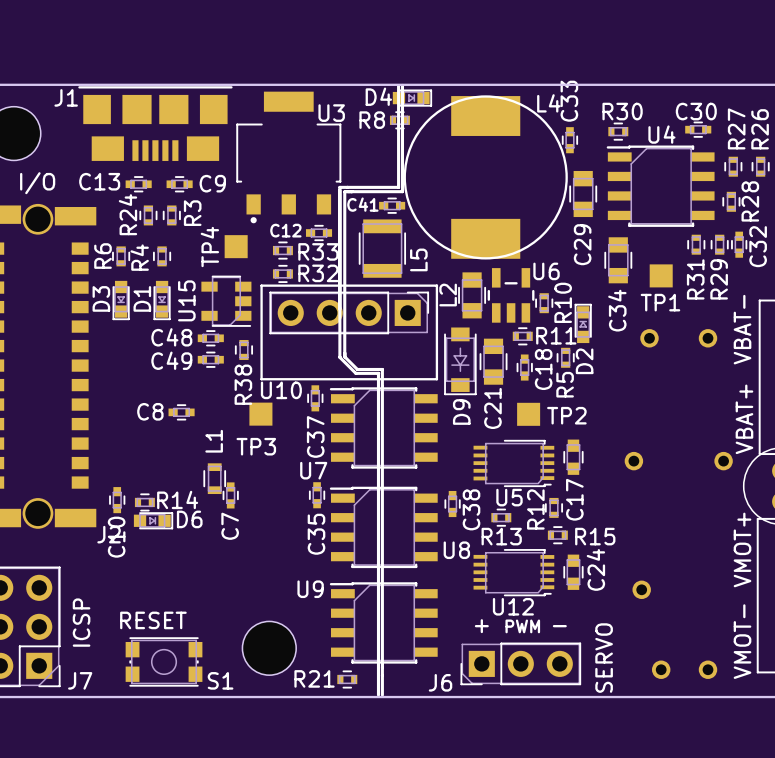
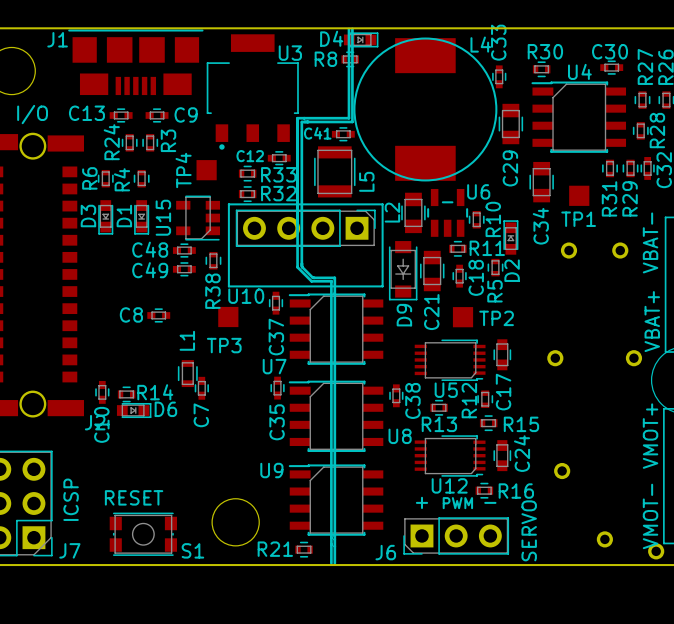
R16: none -> (484, 490)
part: none -> (604, 539)
part: (661, 669) -> none
part: (707, 669) -> none
part: none -> (656, 551)

